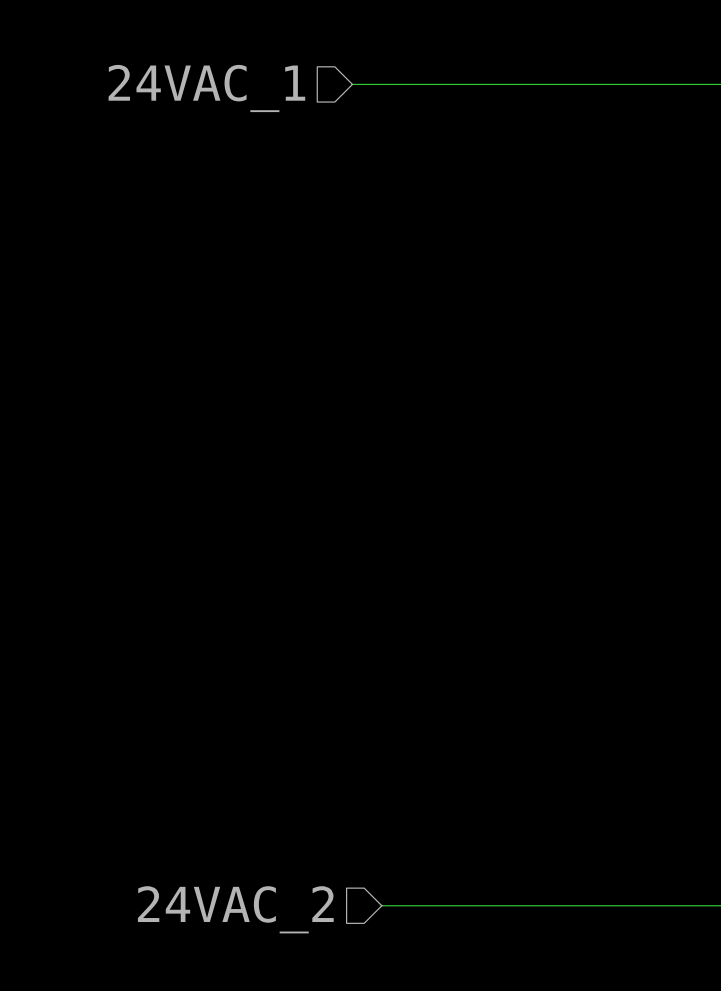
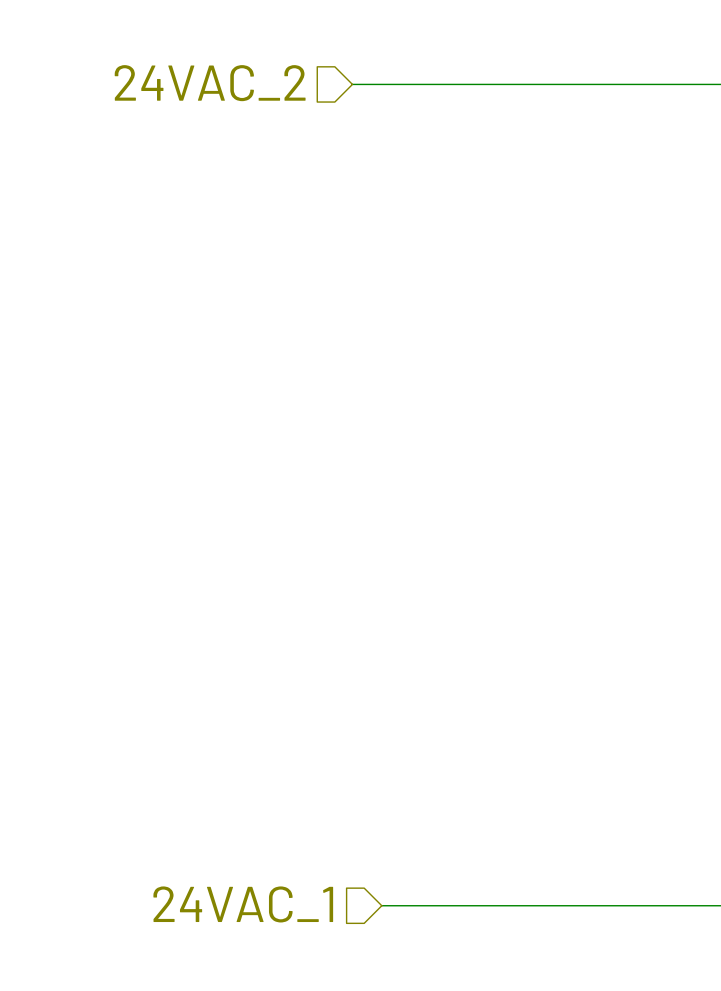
hierarchical label: 24VAC_1 (206, 88) -> 24VAC_2 (210, 83)
hierarchical label: 24VAC_2 (235, 909) -> 24VAC_1 (243, 904)

